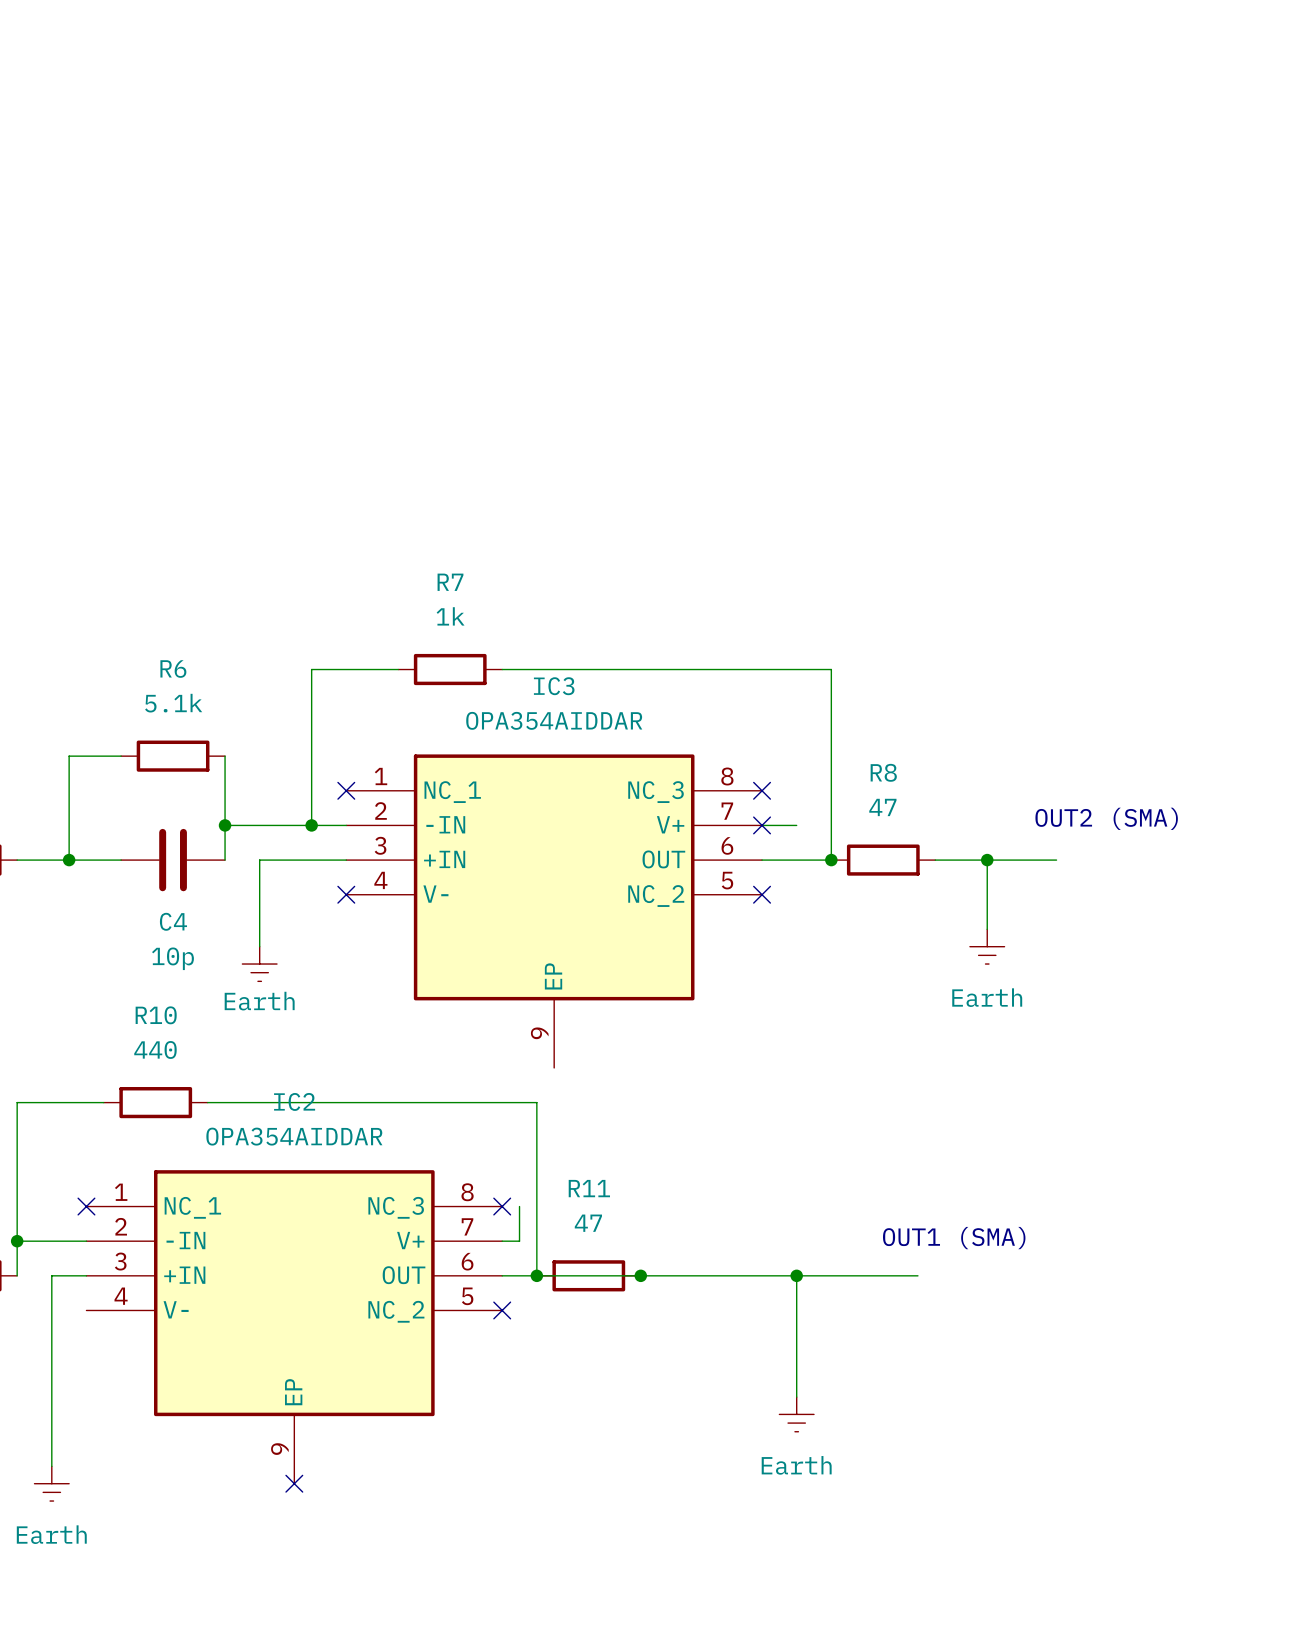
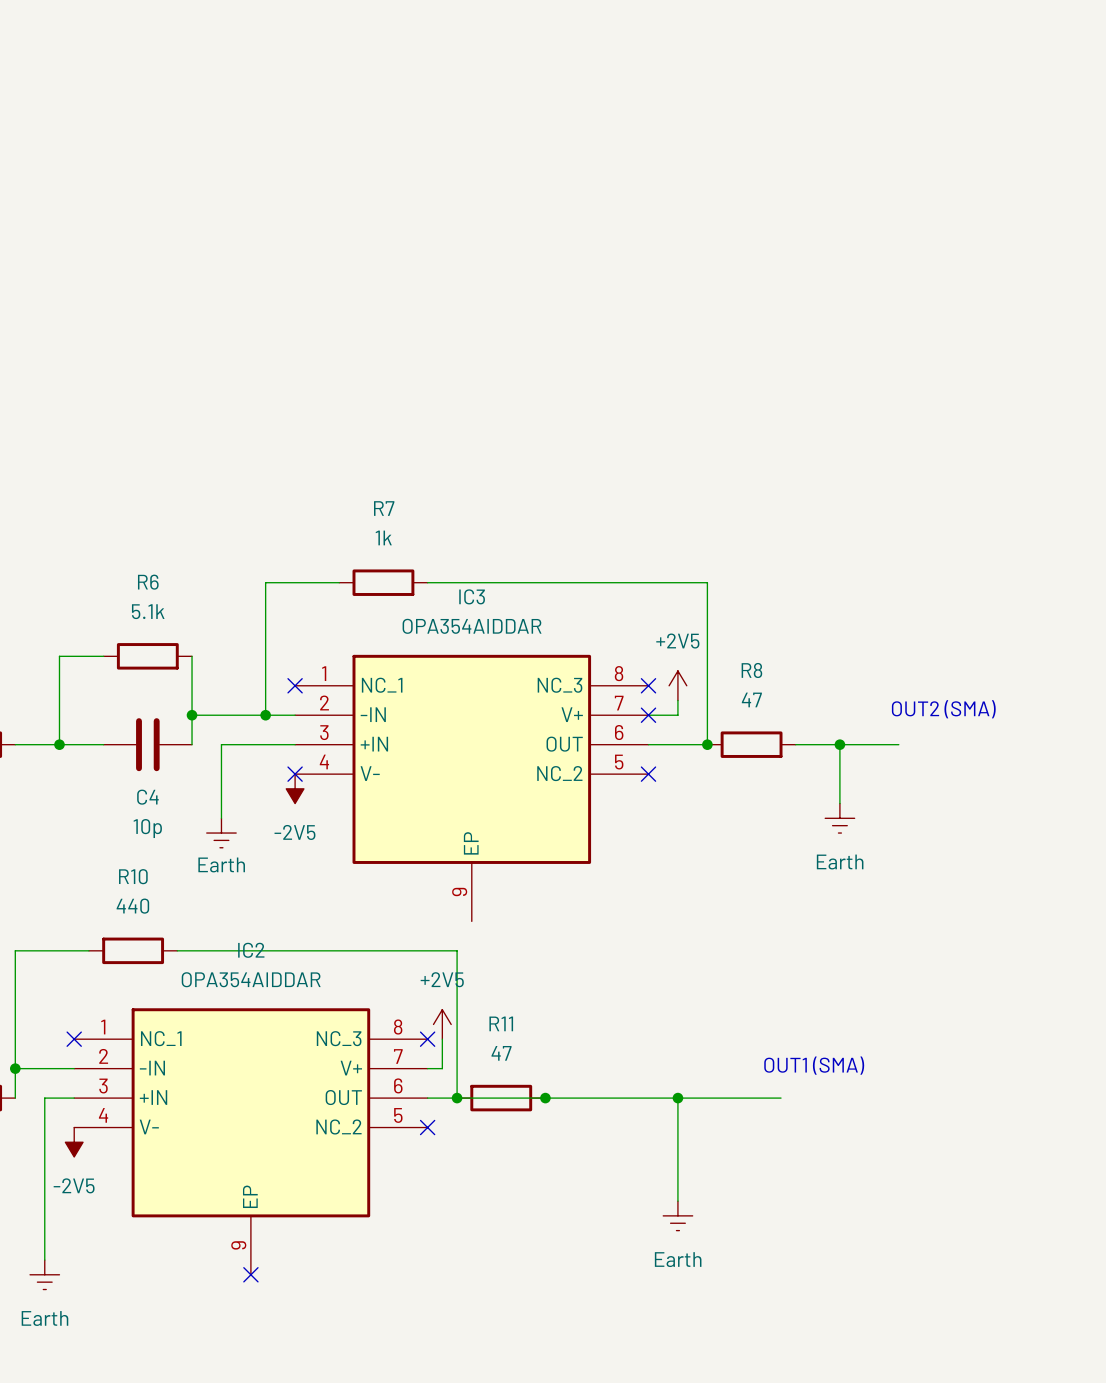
power symbol: none -> +2V5 (677, 685)
wire: none -> (677, 700) (677, 715)
power symbol: none -> -2V5 (295, 788)
power symbol: none -> +2V5 (442, 1024)
power symbol: none -> -2V5 (74, 1142)

